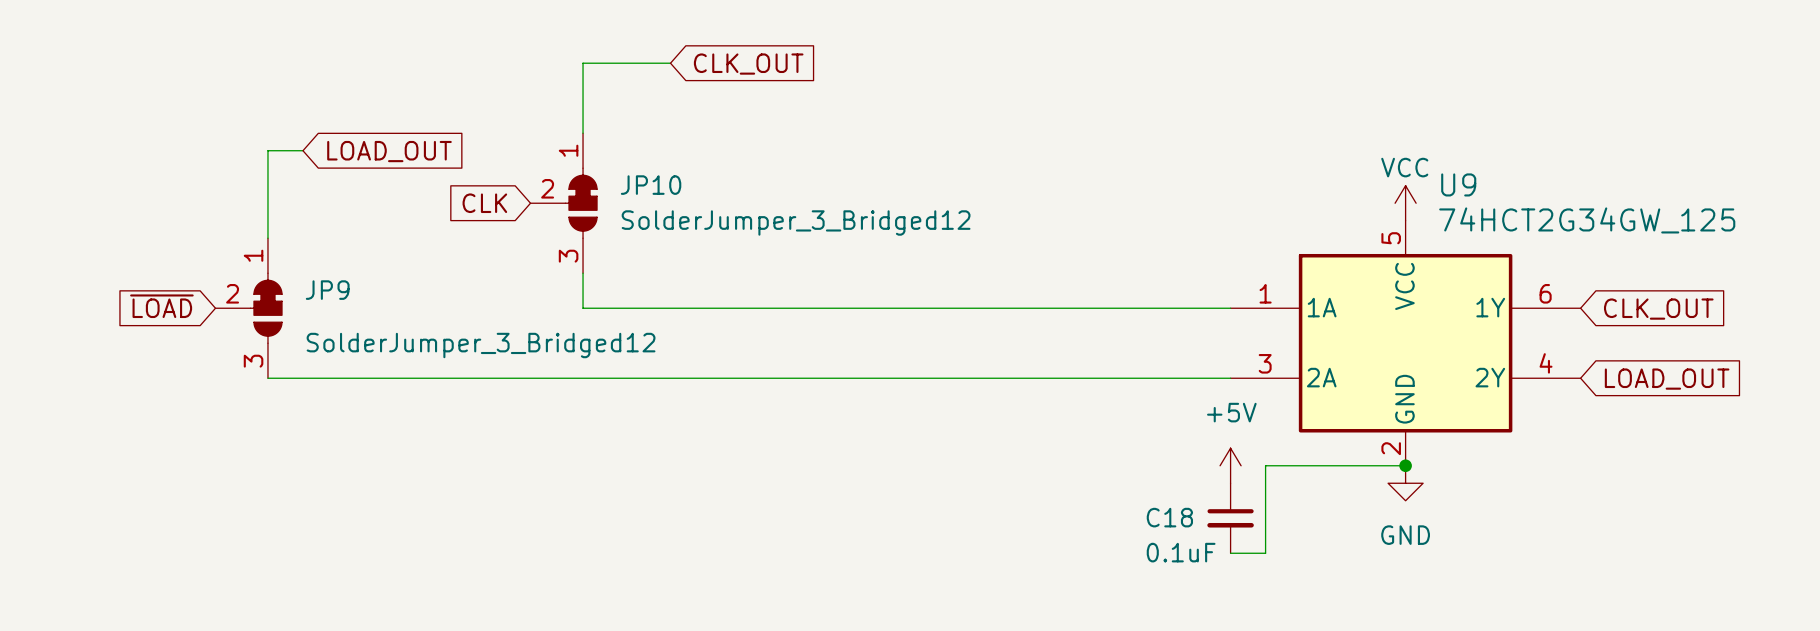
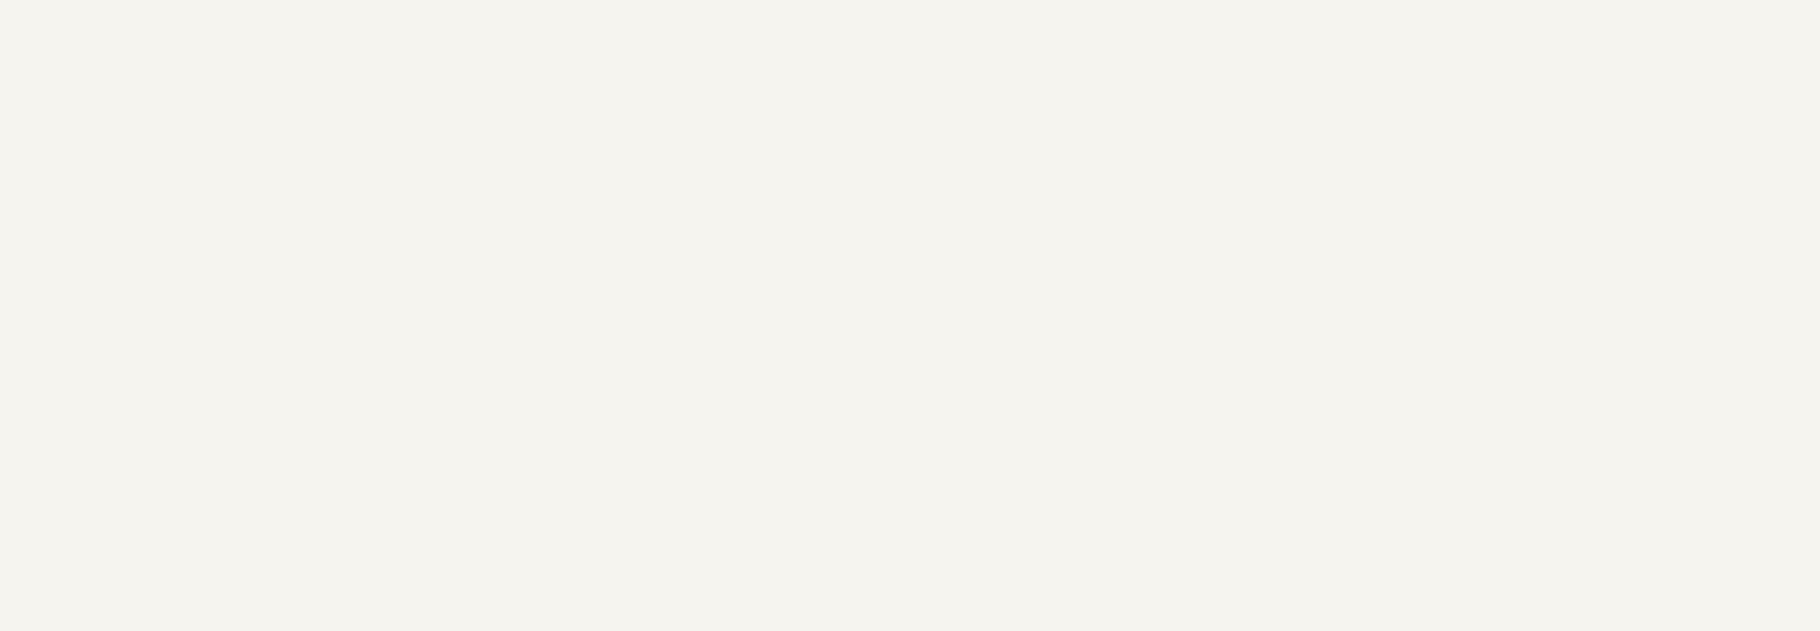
wire: (670, 63) (583, 63) (583, 133) -> none
global label: CLK_OUT (748, 64) -> none
wire: (302, 150) (267, 150) (267, 238) -> none
global label: LOAD_OUT (389, 151) -> none
global label: CLK (484, 203) -> none
JP10: SolderJumper_3_Bridged12 (563, 203) -> none
power symbol: VCC (1405, 203) -> none
wire: (583, 273) (583, 308) (1230, 308) -> none
global label: ~{LOAD} (161, 306) -> none
JP9: SolderJumper_3_Bridged12 (248, 308) -> none
global label: CLK_OUT (1658, 309) -> none
U9: 74HCT2G34GW_125 (1405, 343) -> none
wire: (267, 378) (1230, 378) -> none
global label: LOAD_OUT (1667, 379) -> none
power symbol: +5V (1230, 465) -> none
wire: (1405, 465) (1265, 465) (1265, 553) (1230, 553) -> none
junction: (1405, 465) -> none
power symbol: GND (1405, 483) -> none
C18: 0.1uF (1230, 518) -> none

